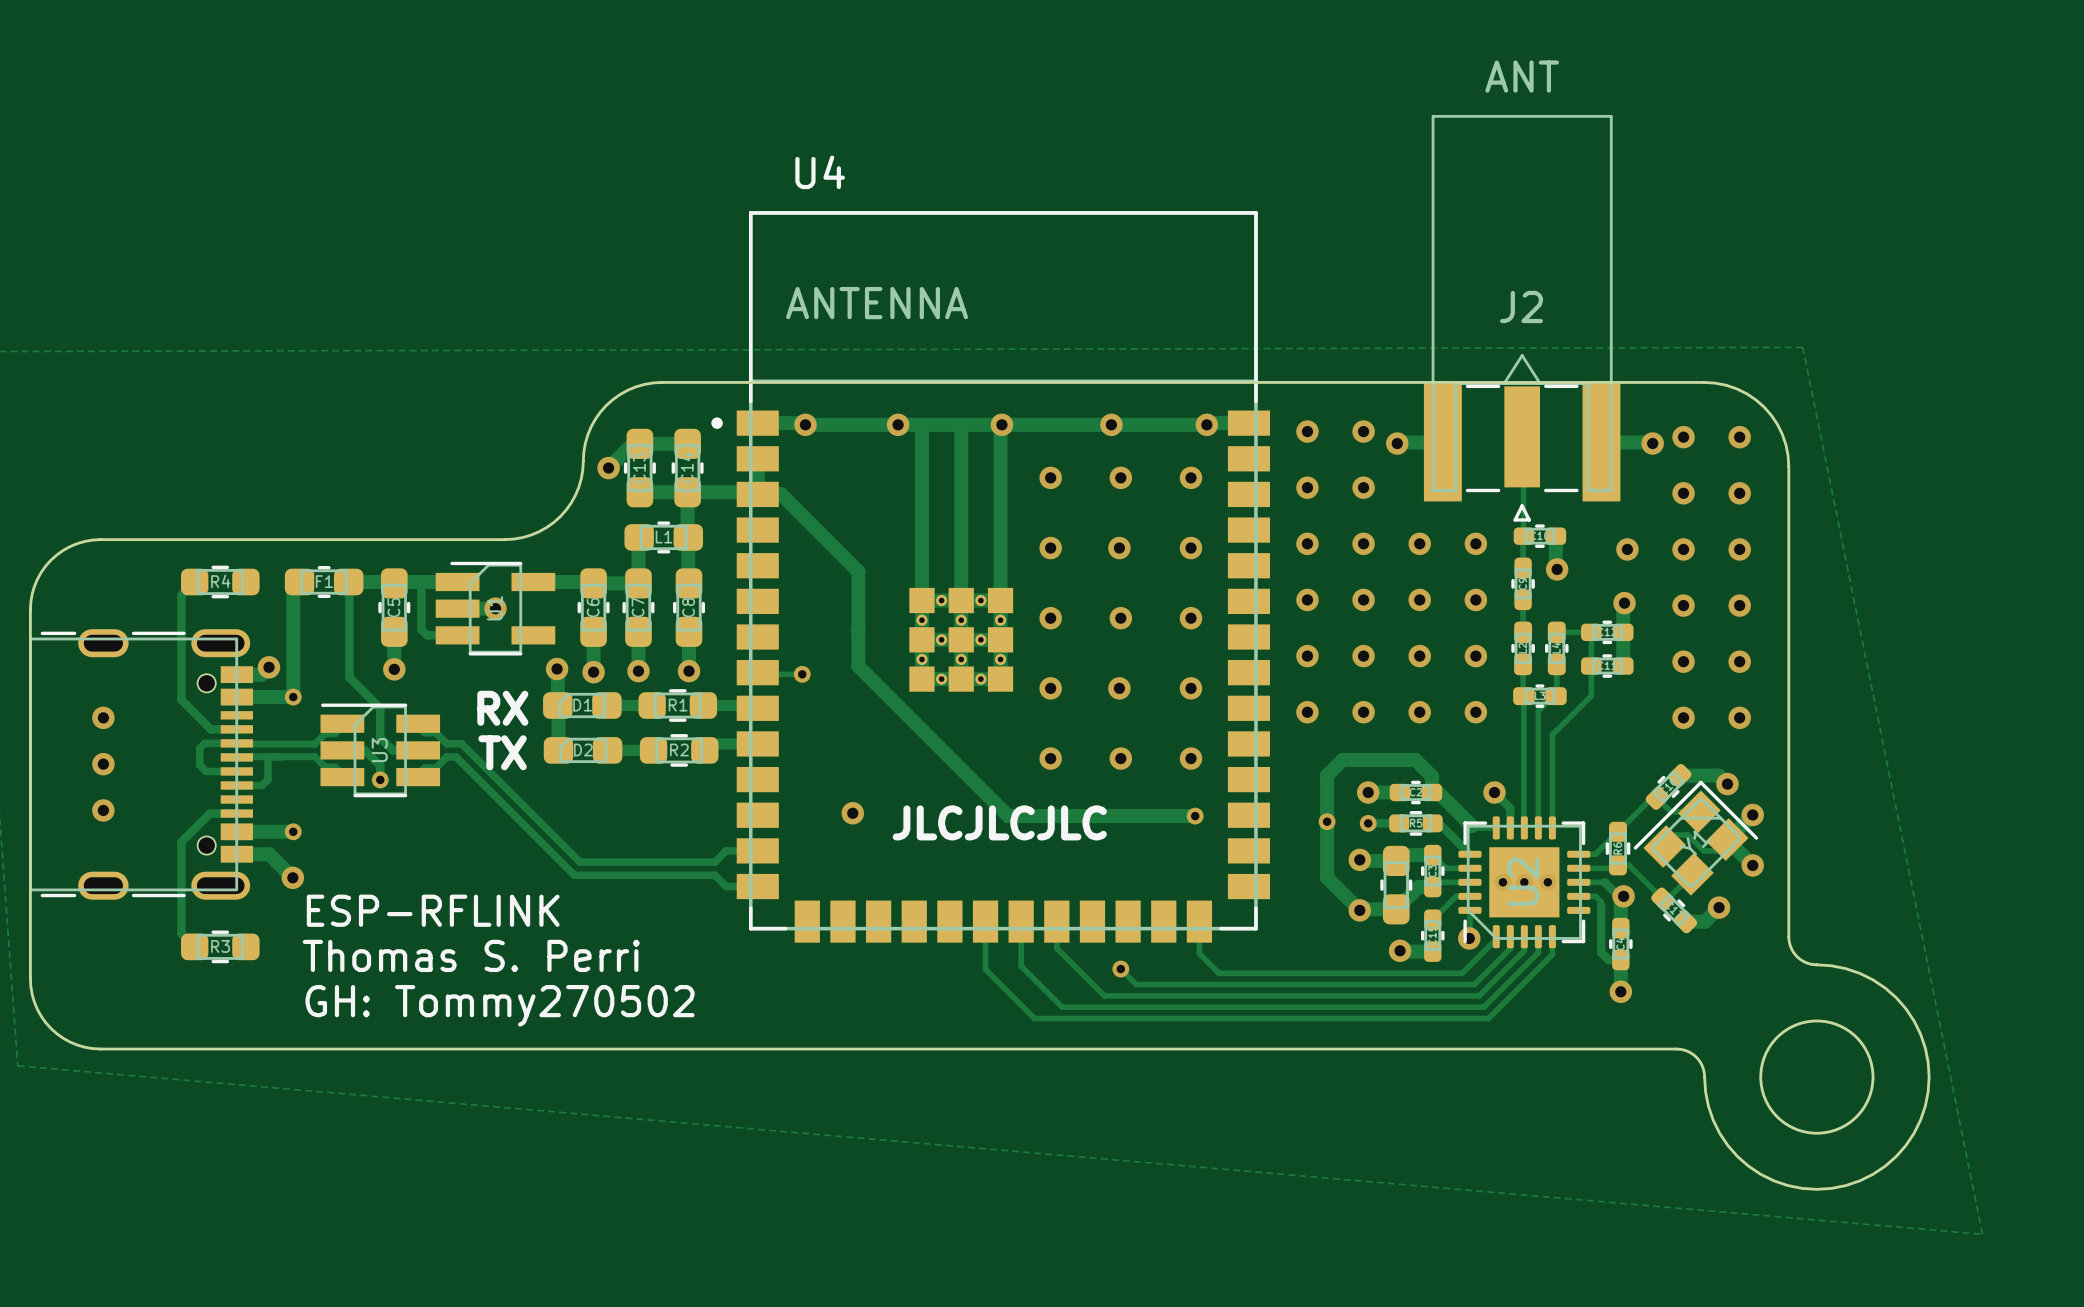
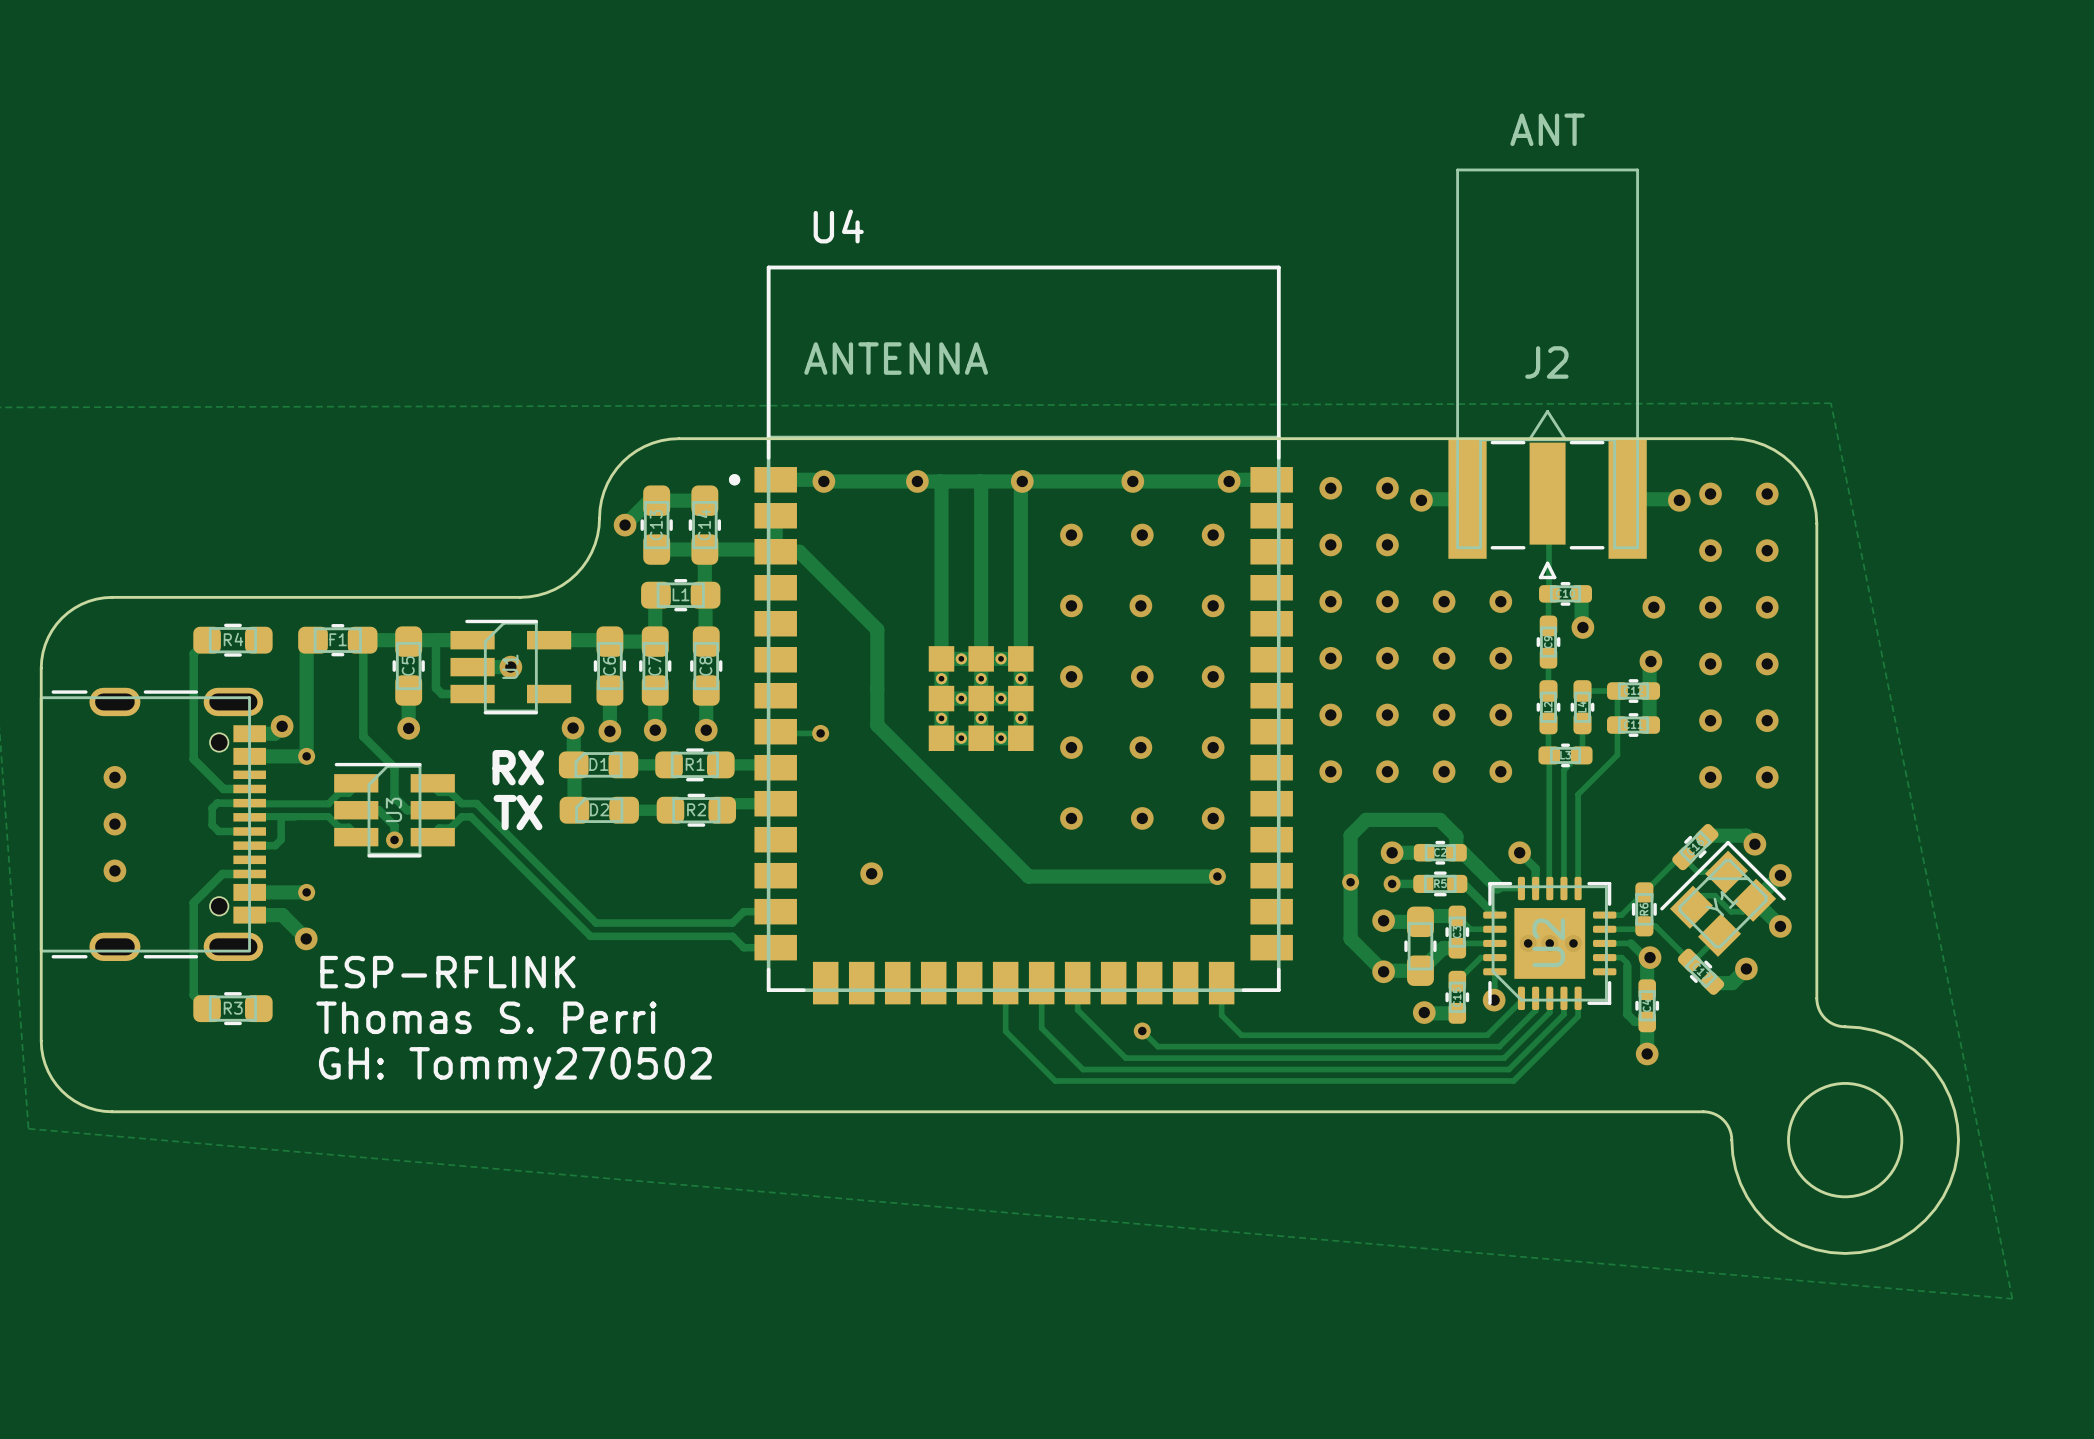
text: JLCJLCJLC (999, 822) -> none

